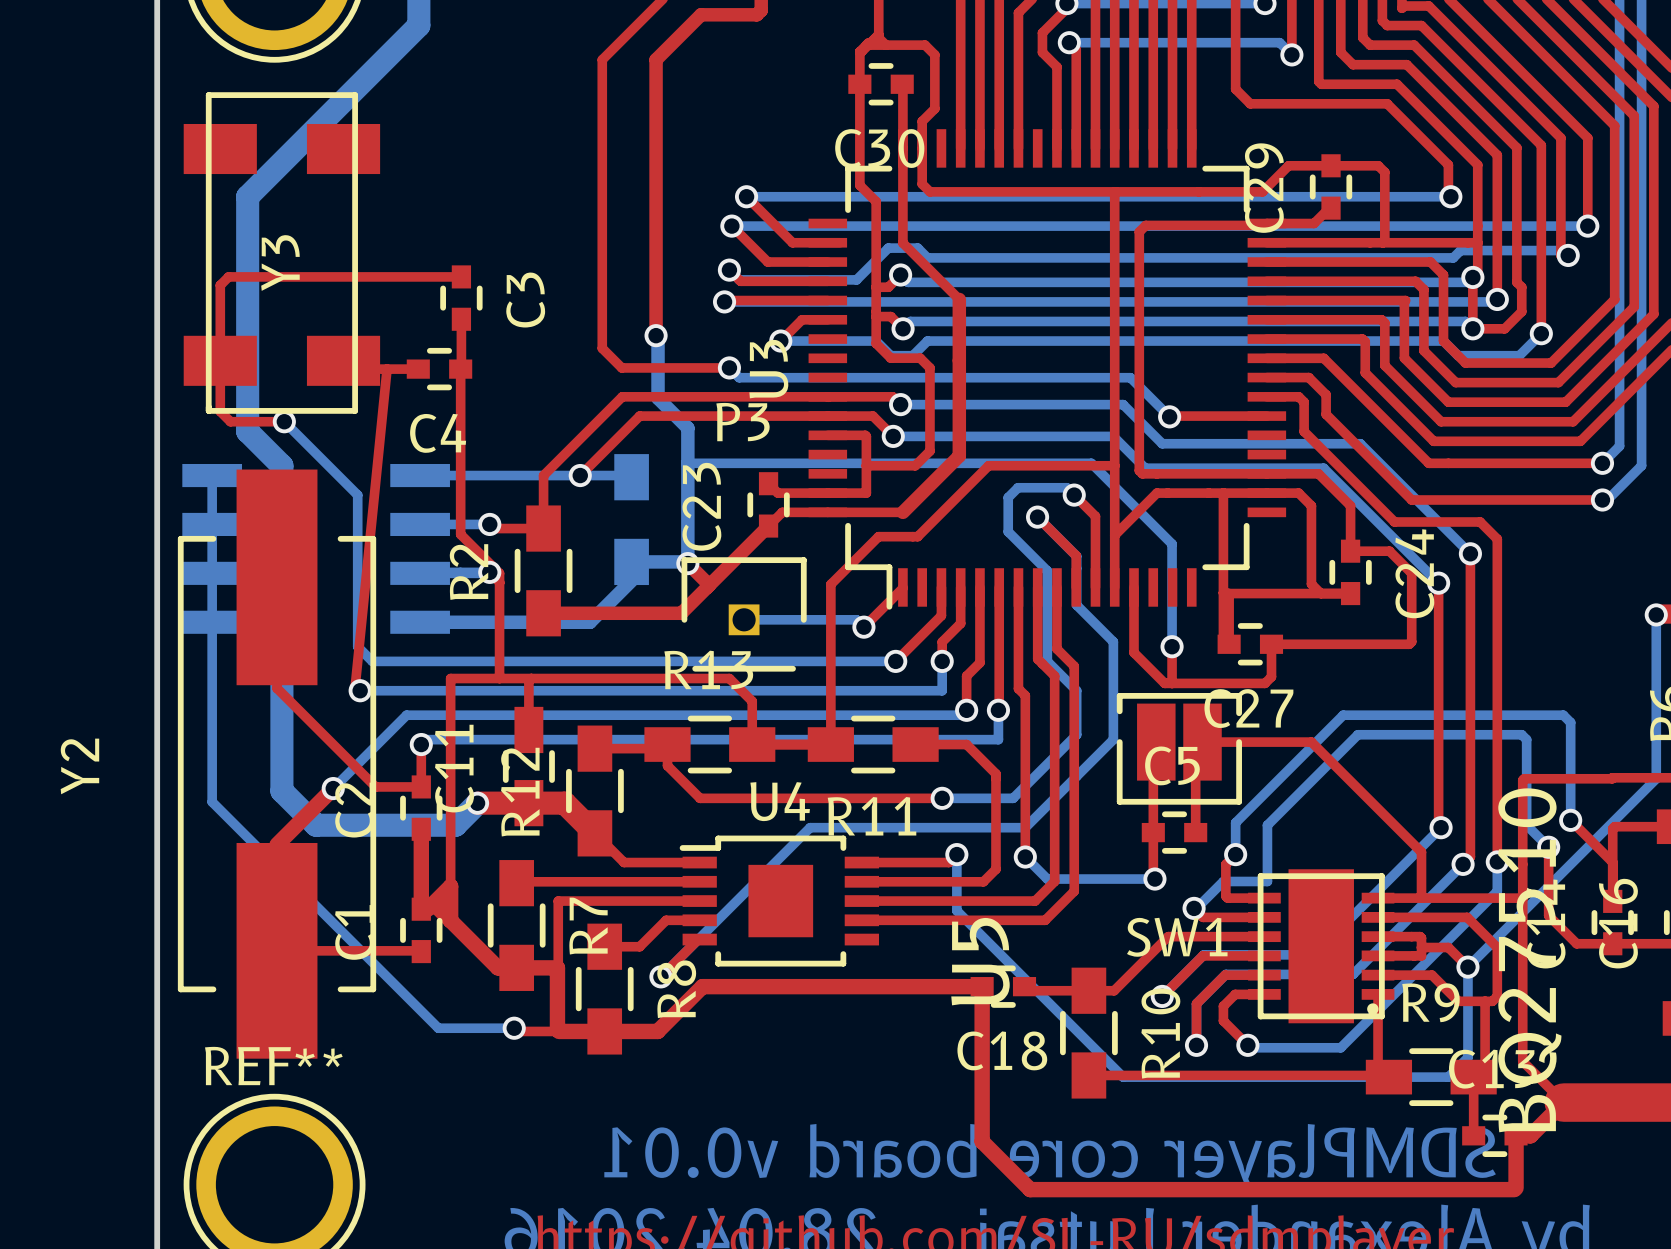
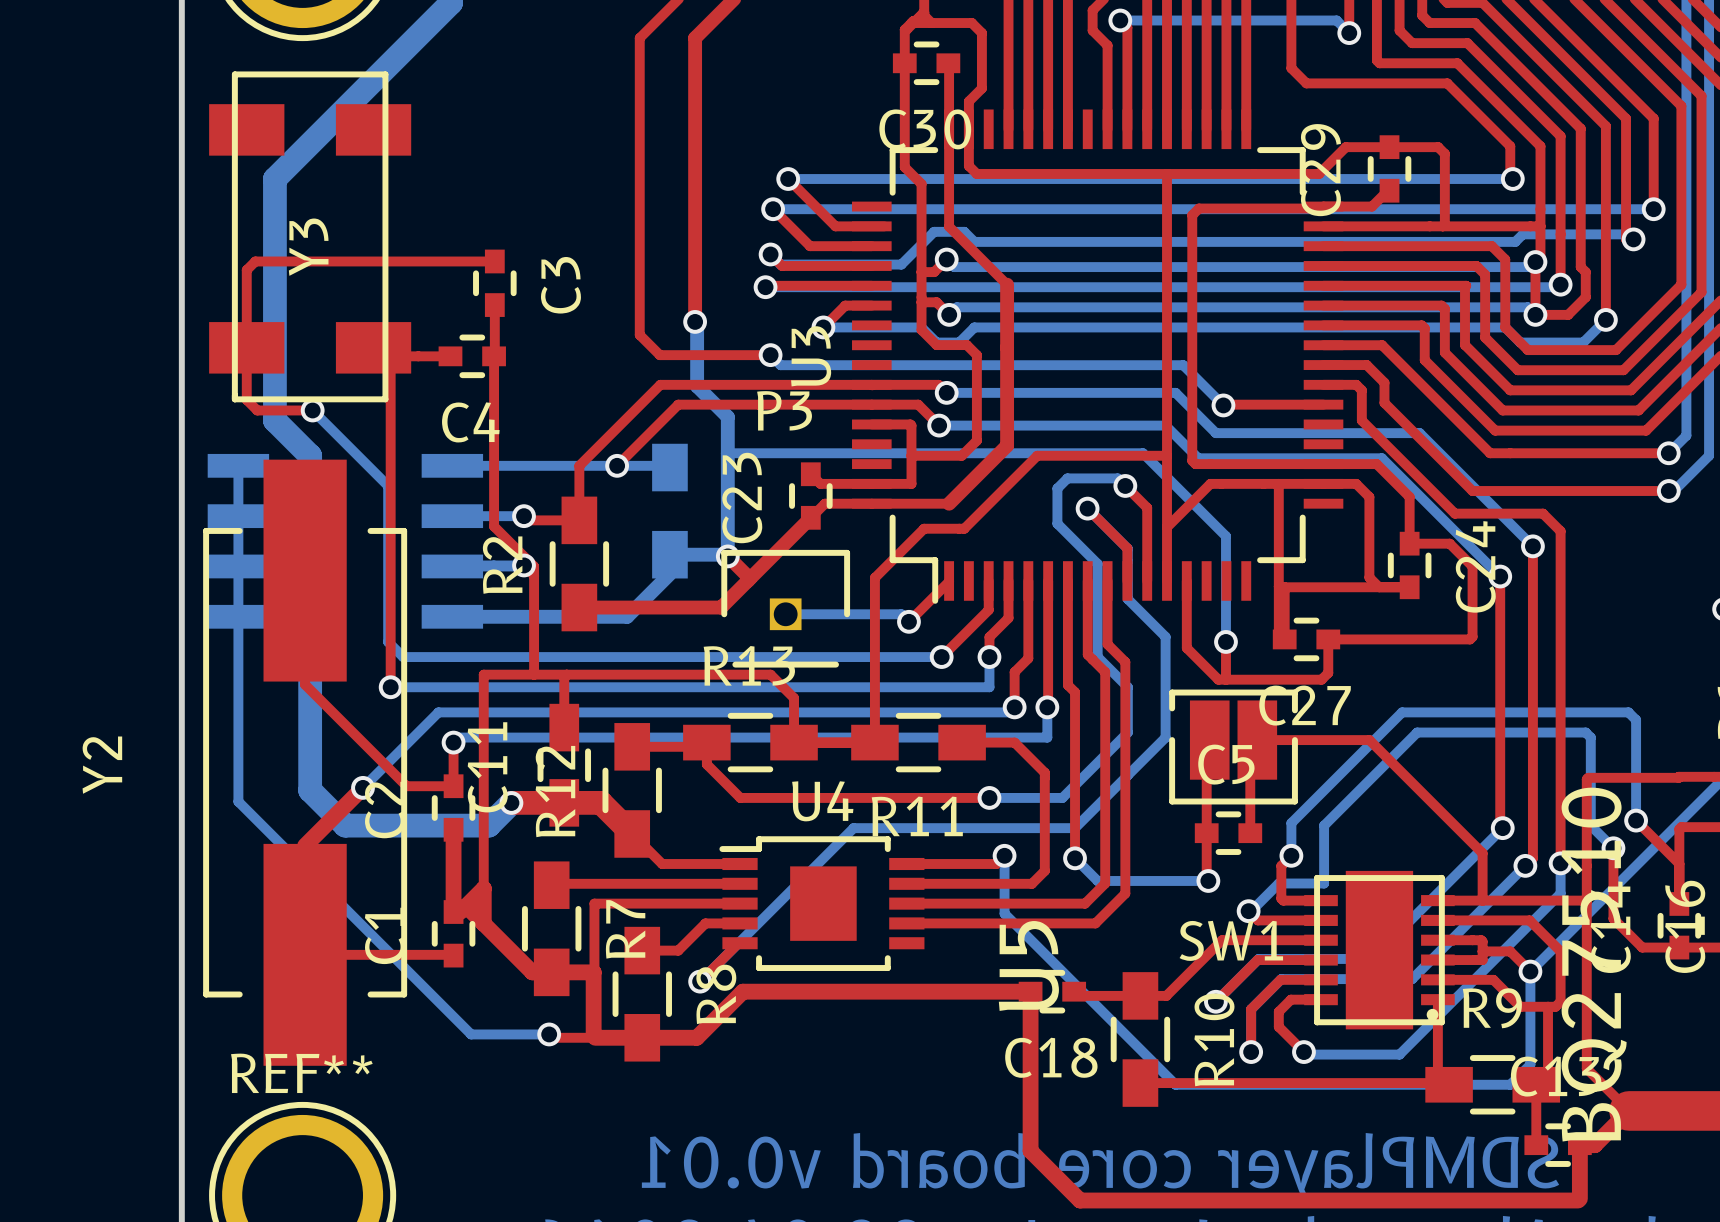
top track: (387, 369) (355, 685) (360, 690) -> (382, 356) (390, 364) (390, 687)

